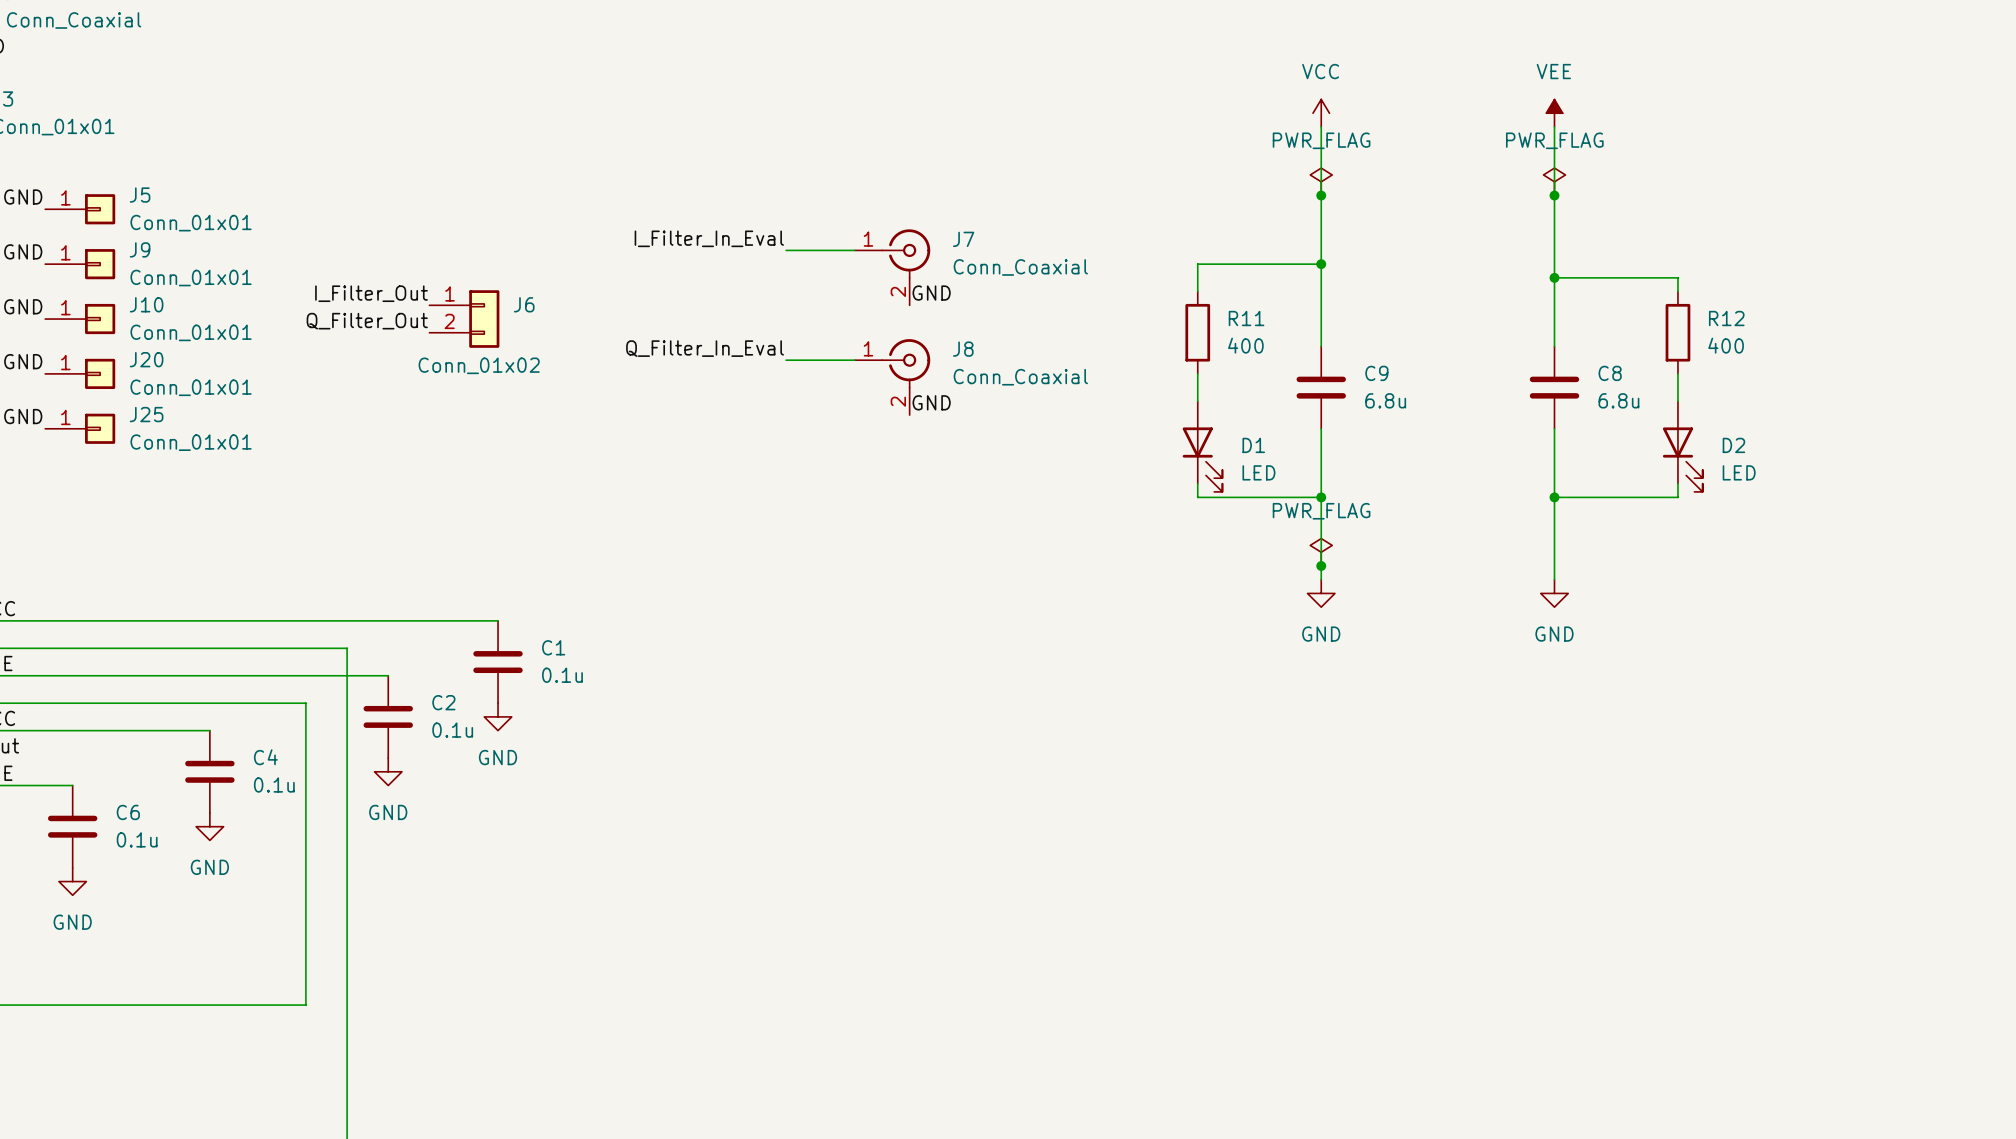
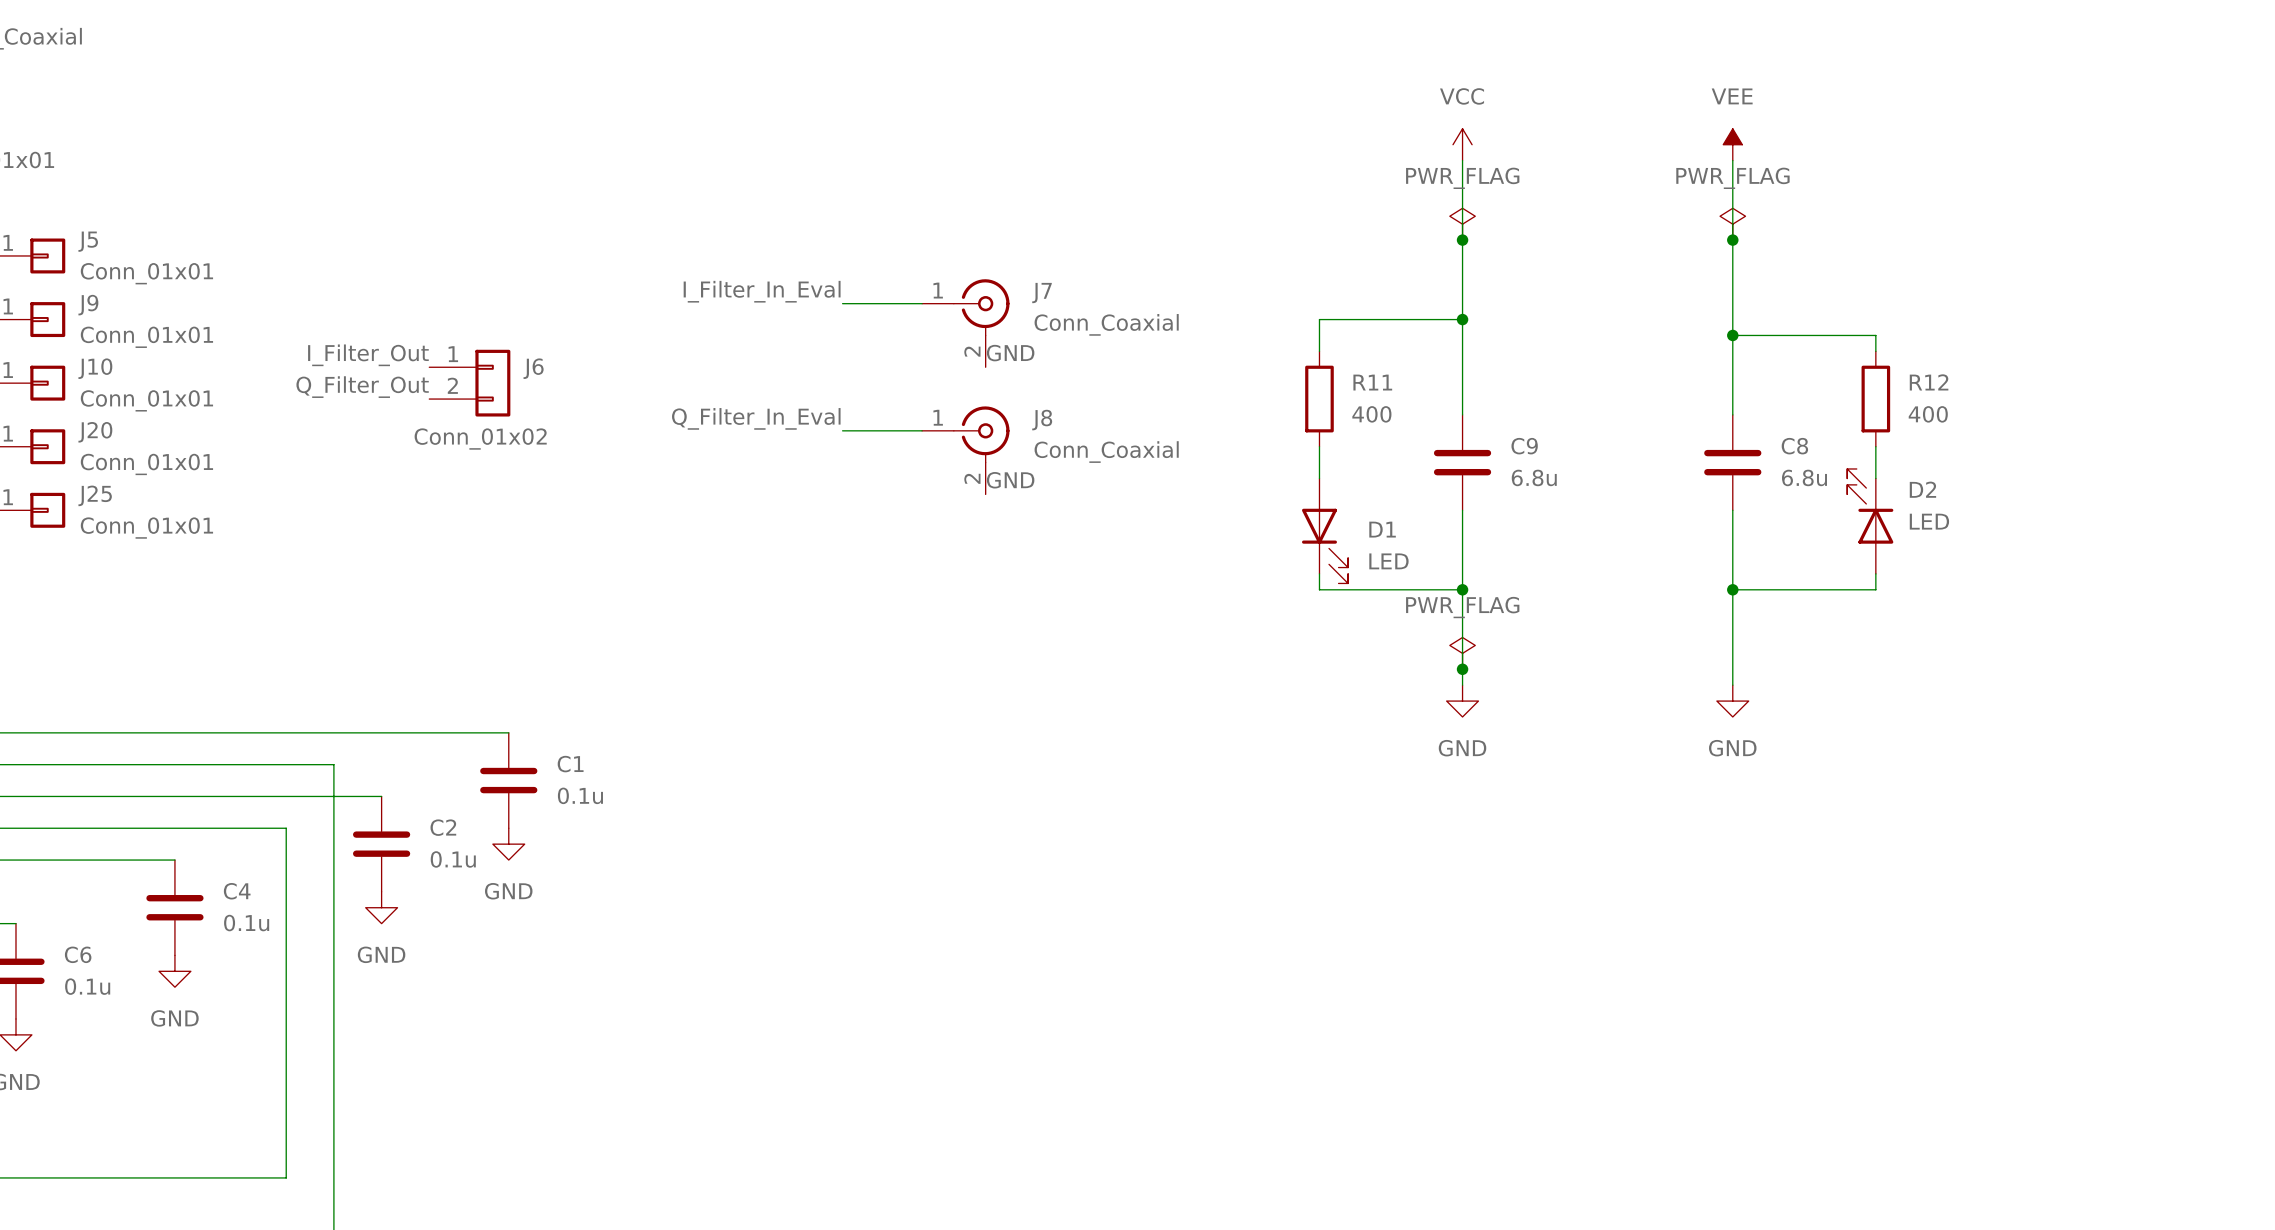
D2 name position: D2 (1733, 445) -> D2 (1922, 489)
D2 rotation: 0° (1682, 459) -> 180° (1870, 506)
D2 value position: LED (1739, 472) -> LED (1929, 521)

